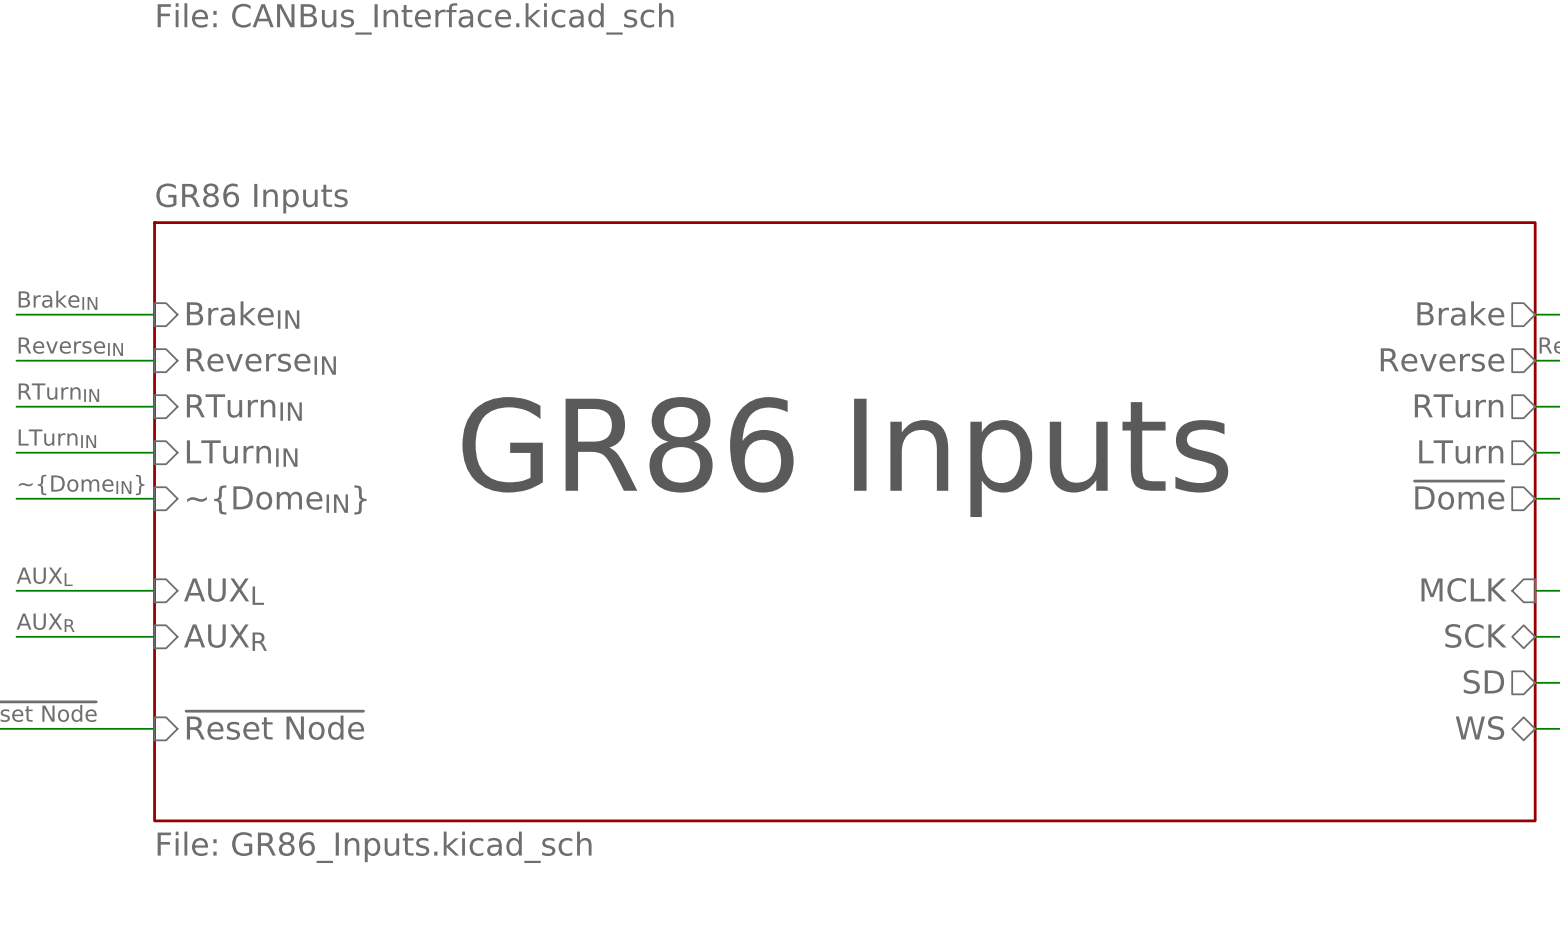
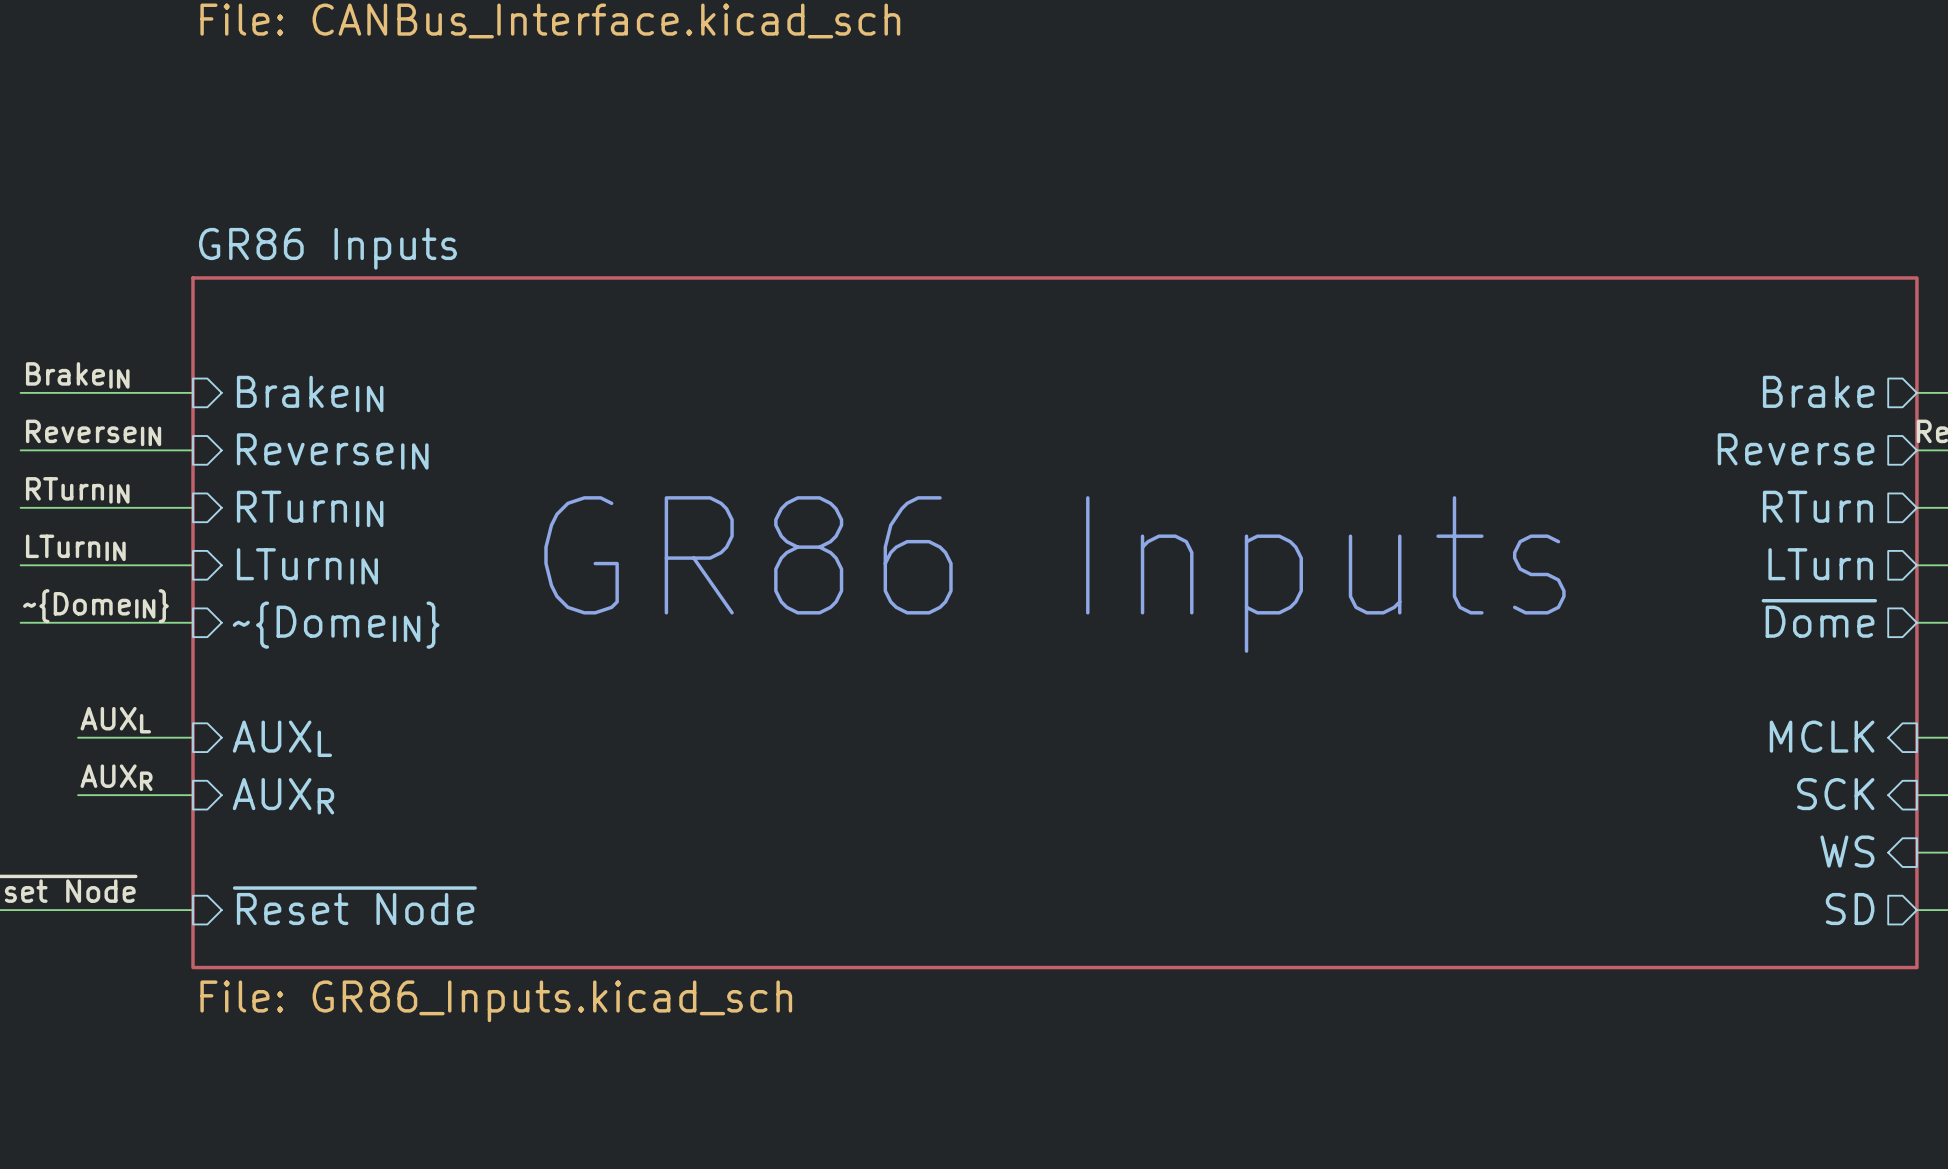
sheet GR86 Inputs shape: [153, 221, 1537, 823] -> [191, 276, 1919, 970]
label position: AUXL (44, 576) -> AUXL (115, 720)
wire: (16, 590) (62, 590) -> none
label position: AUXR (45, 622) -> AUXR (116, 777)
sheet pin shape: bidirectional (1475, 635) -> input (1835, 794)
wire: (16, 636) (62, 636) -> none
sheet pin shape: output (1483, 681) -> input (1847, 851)
sheet pin: SD (1483, 681) -> WS (1847, 851)
sheet pin shape: bidirectional (1479, 728) -> output (1850, 909)
sheet pin: WS (1479, 728) -> SD (1850, 909)

